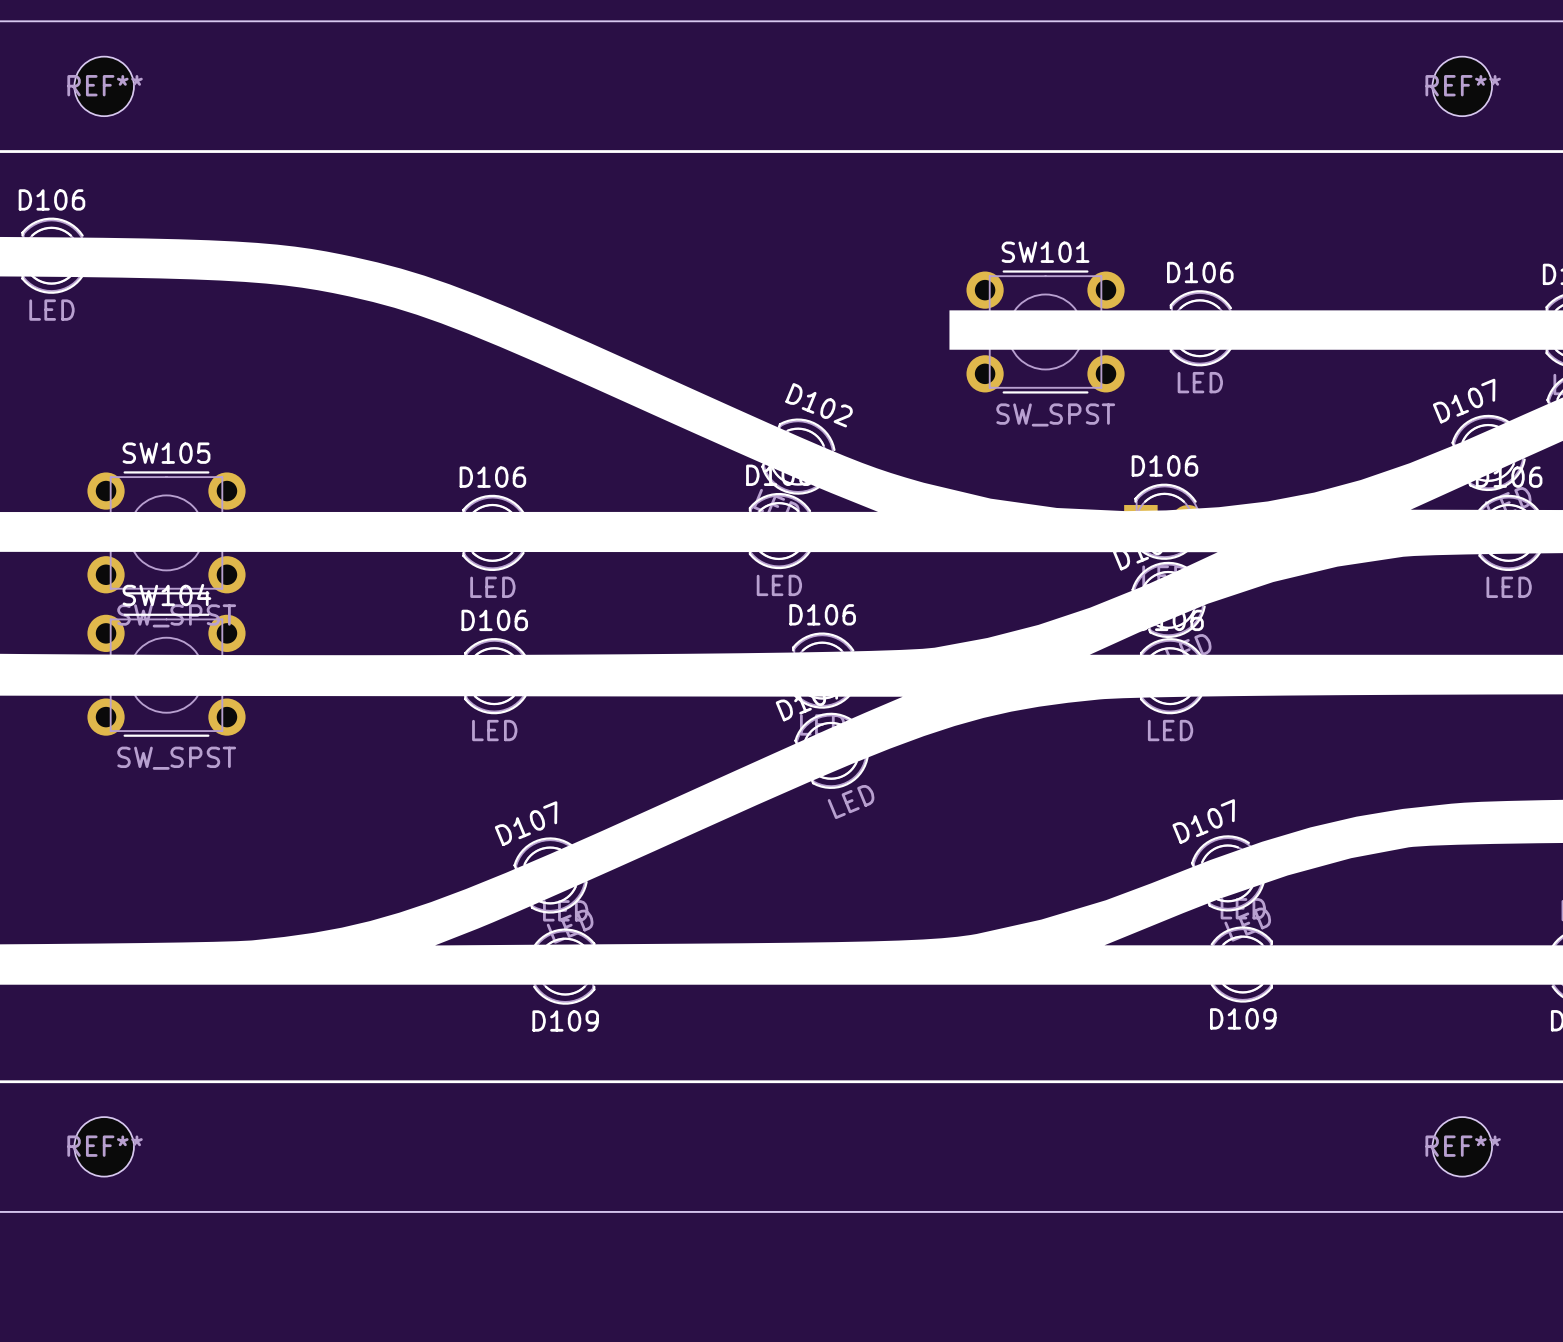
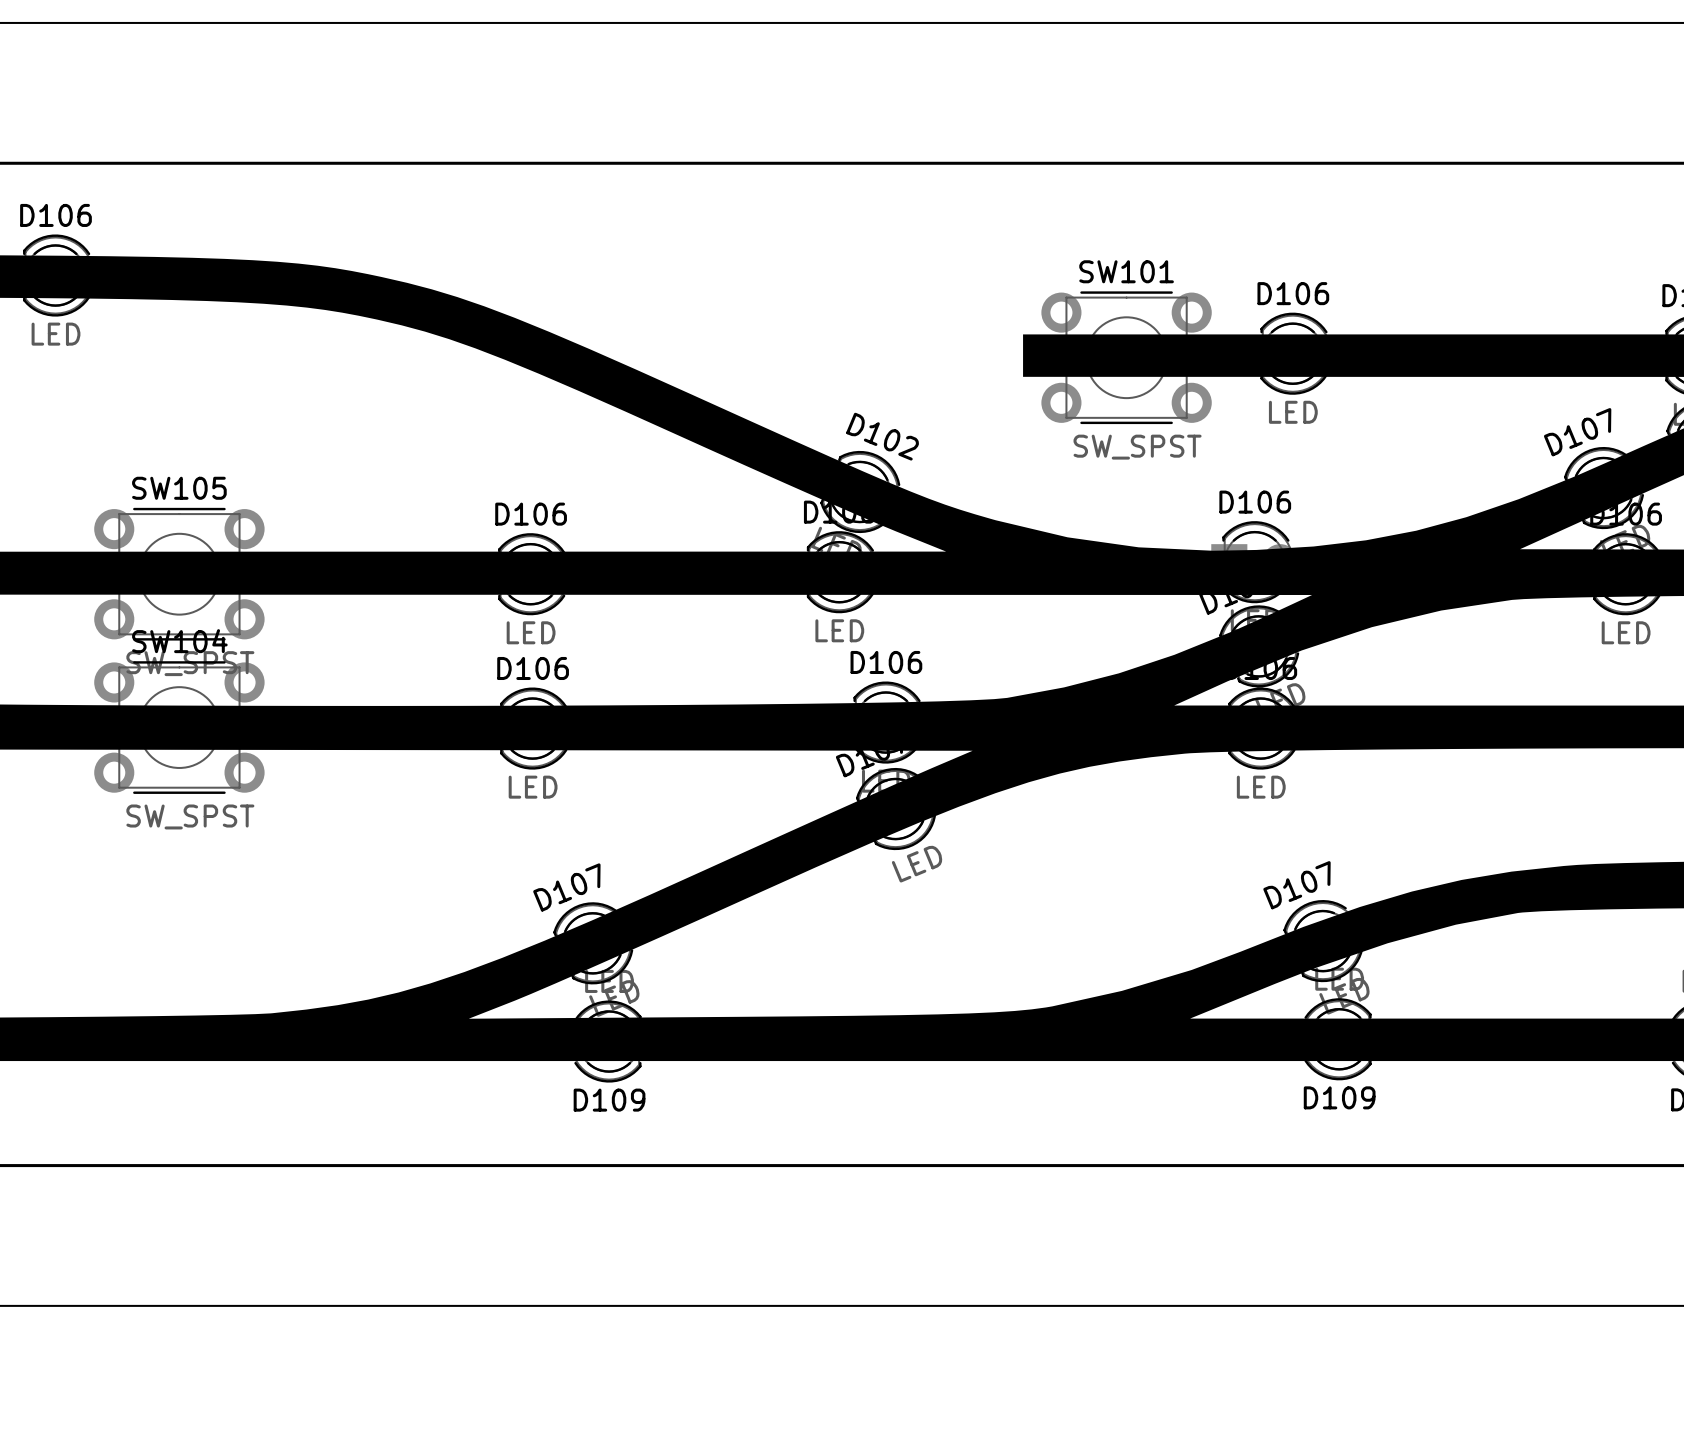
REF**: (104, 86) -> none
REF**: (1462, 86) -> none
REF**: (104, 1146) -> none
REF**: (1462, 1146) -> none

